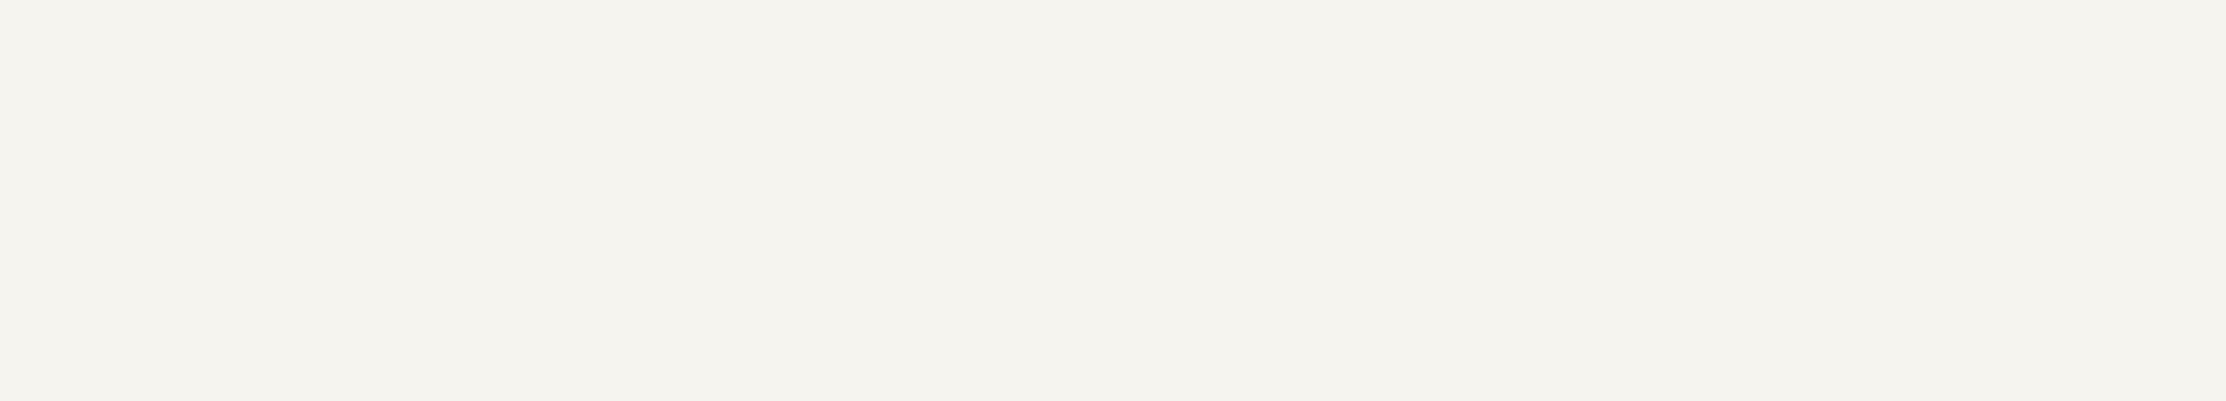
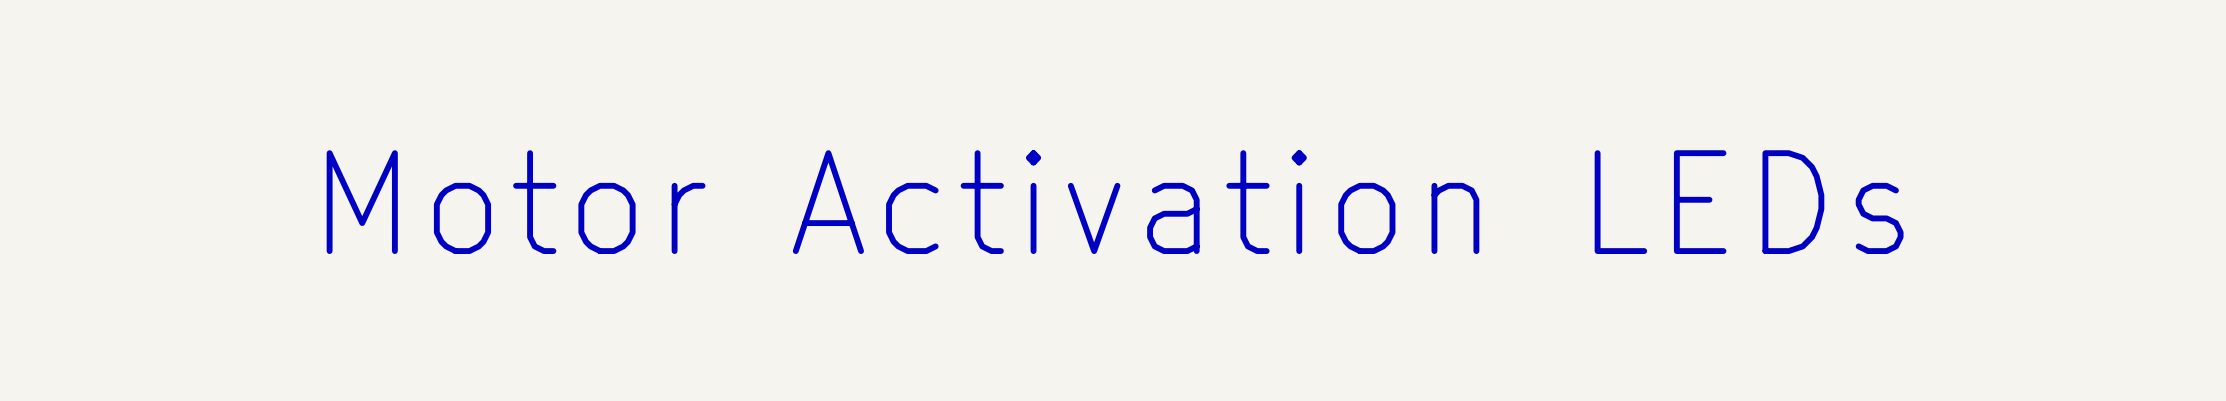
text: none -> Motor Activation LEDs (1115, 202)

